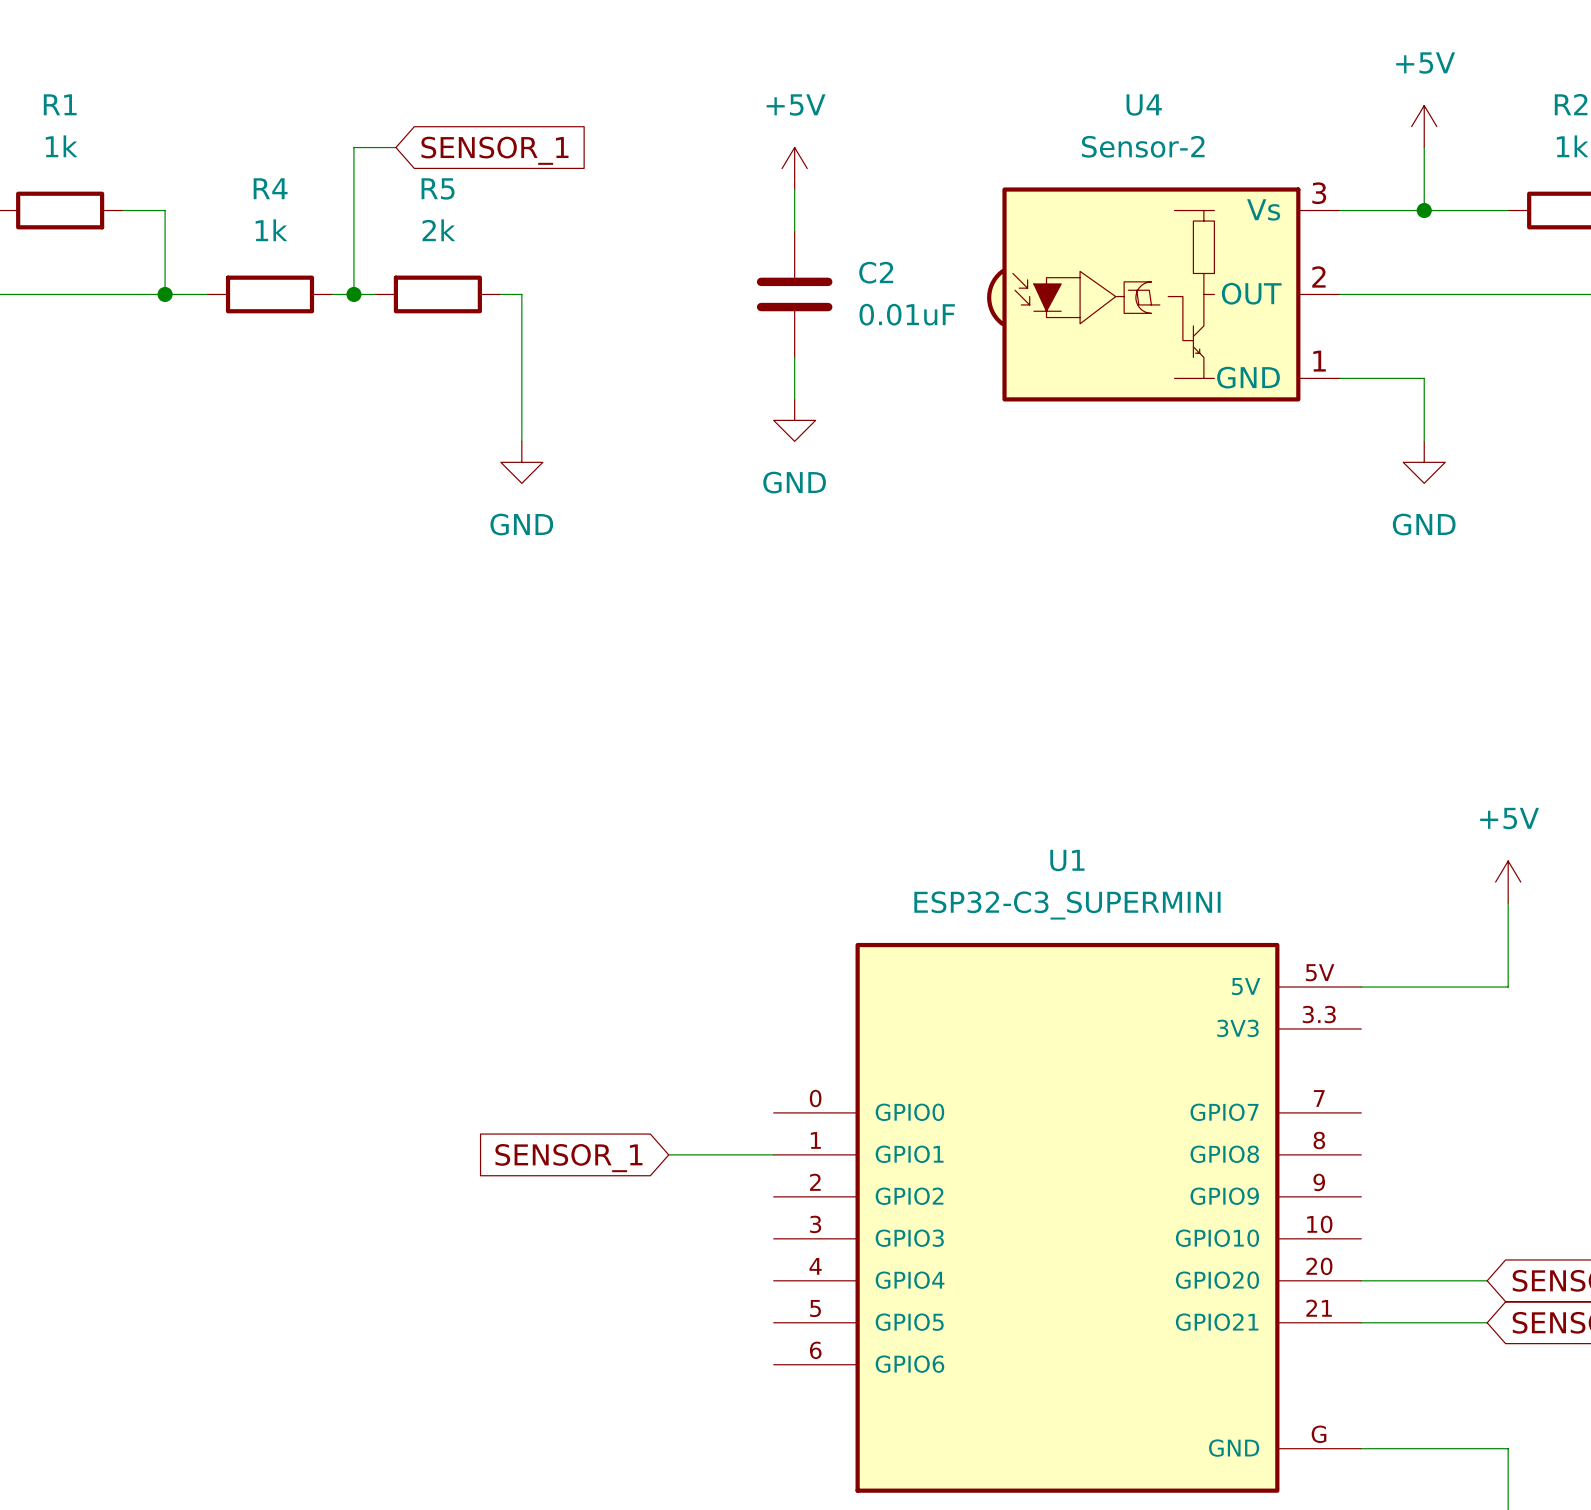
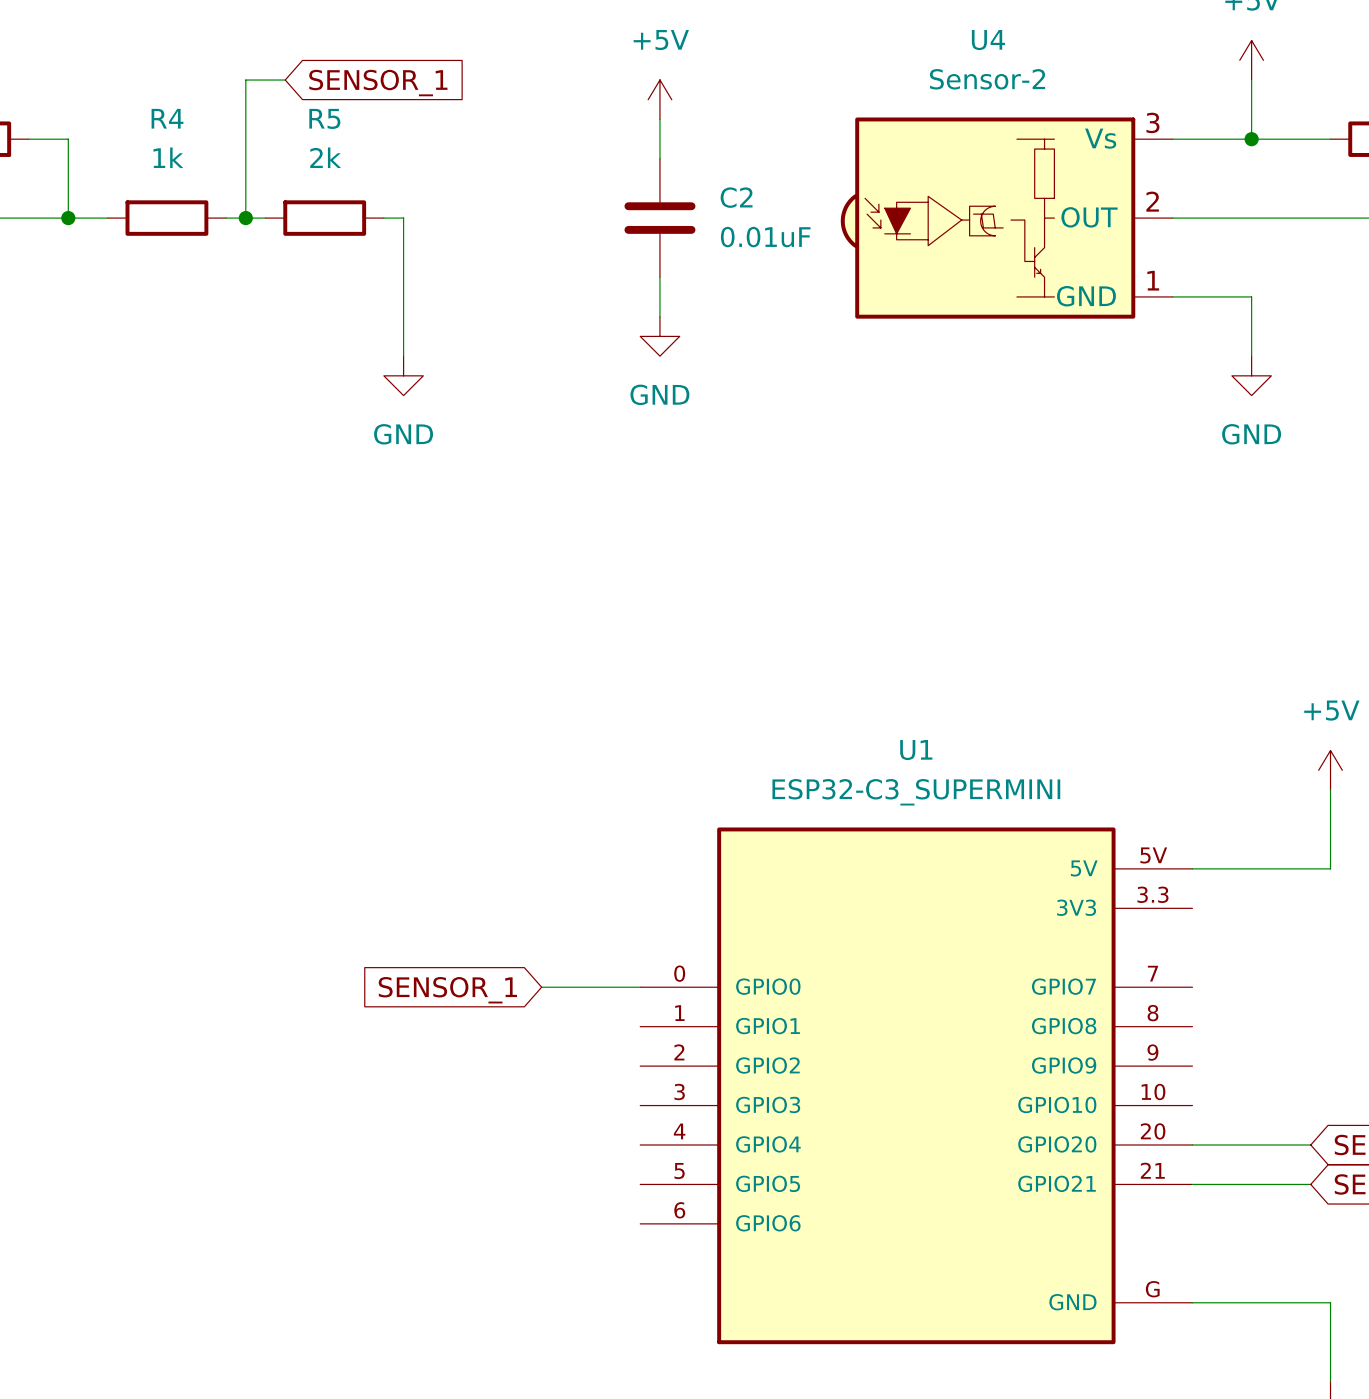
wire: (668, 1154) (773, 1154) -> (541, 987) (640, 987)
global label position: SENSOR_1 (568, 1158) -> SENSOR_1 (447, 990)

